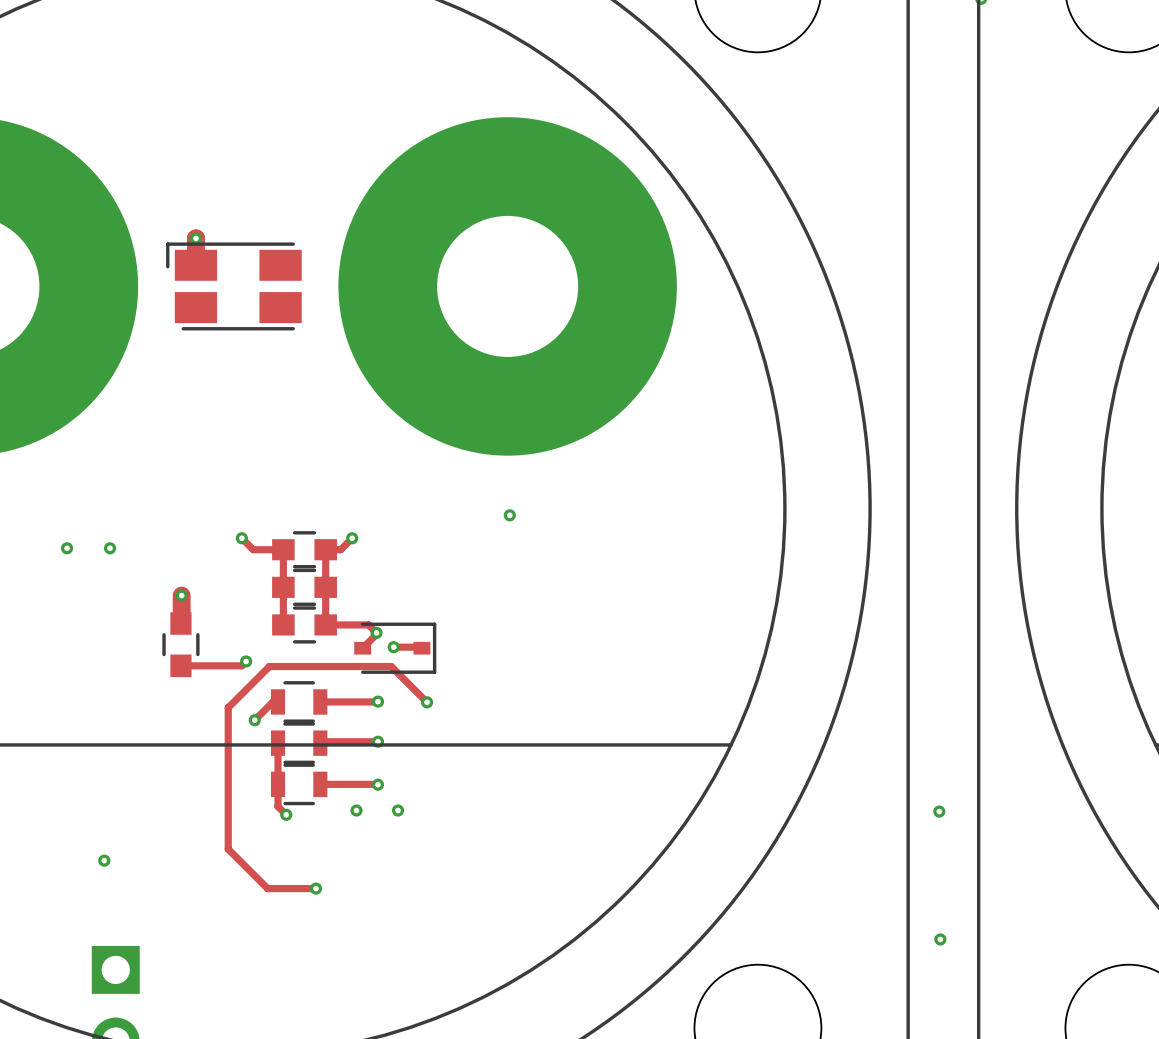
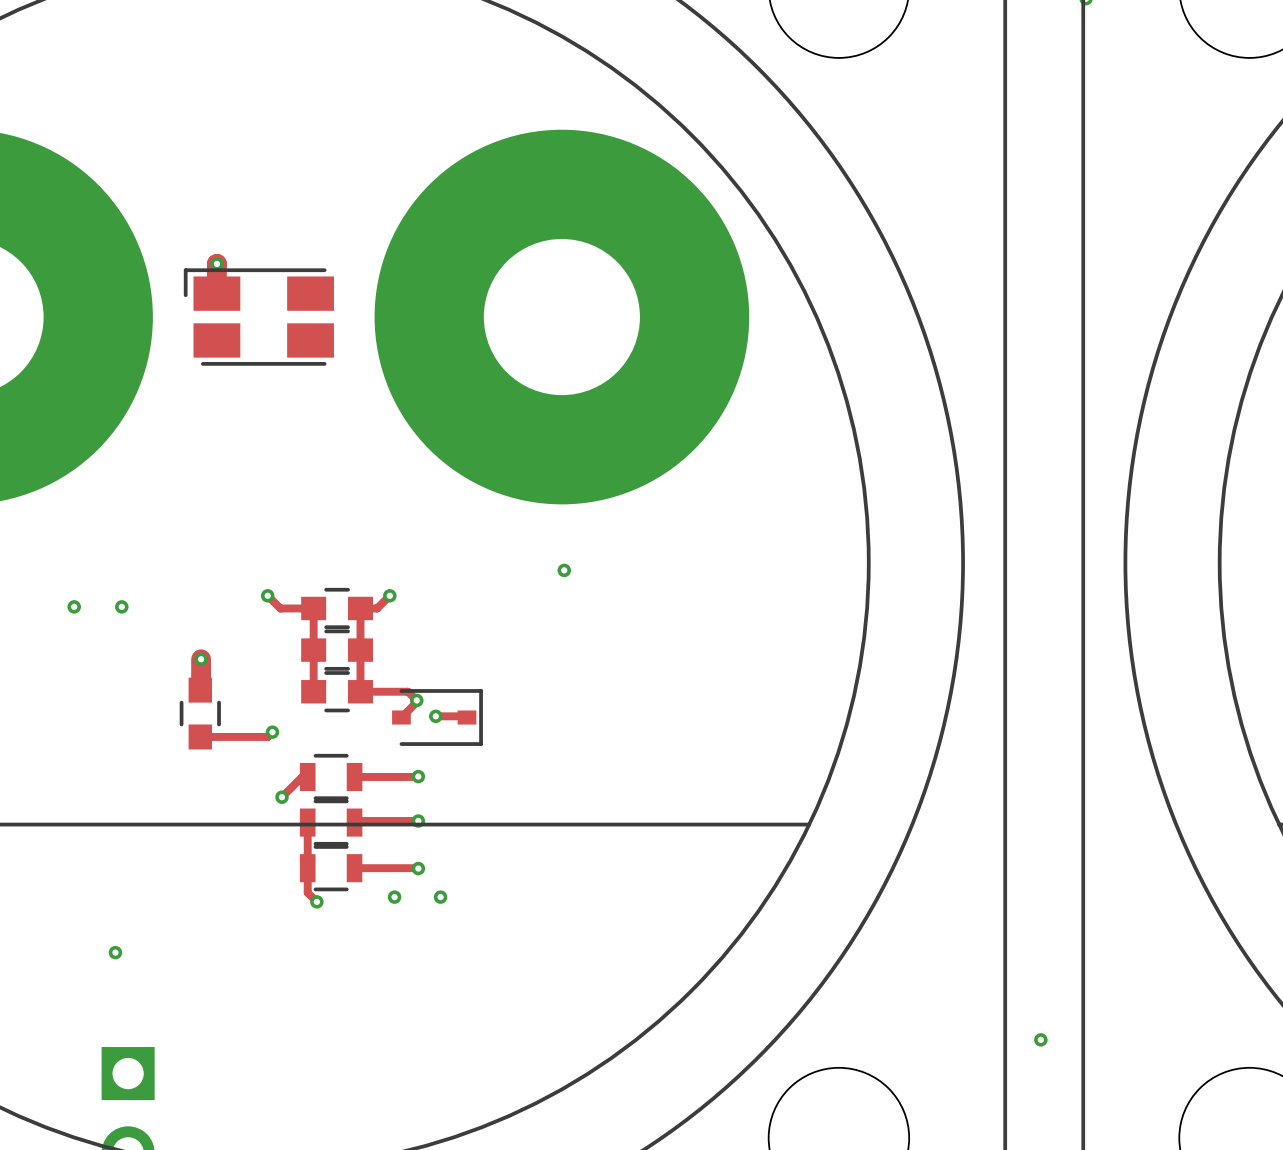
track: (427, 702) (391, 666) (269, 666) (228, 707) (228, 849) (267, 888) (316, 888) -> none
via: (427, 702) -> none
via: (939, 811) -> none
via: (316, 888) -> none

